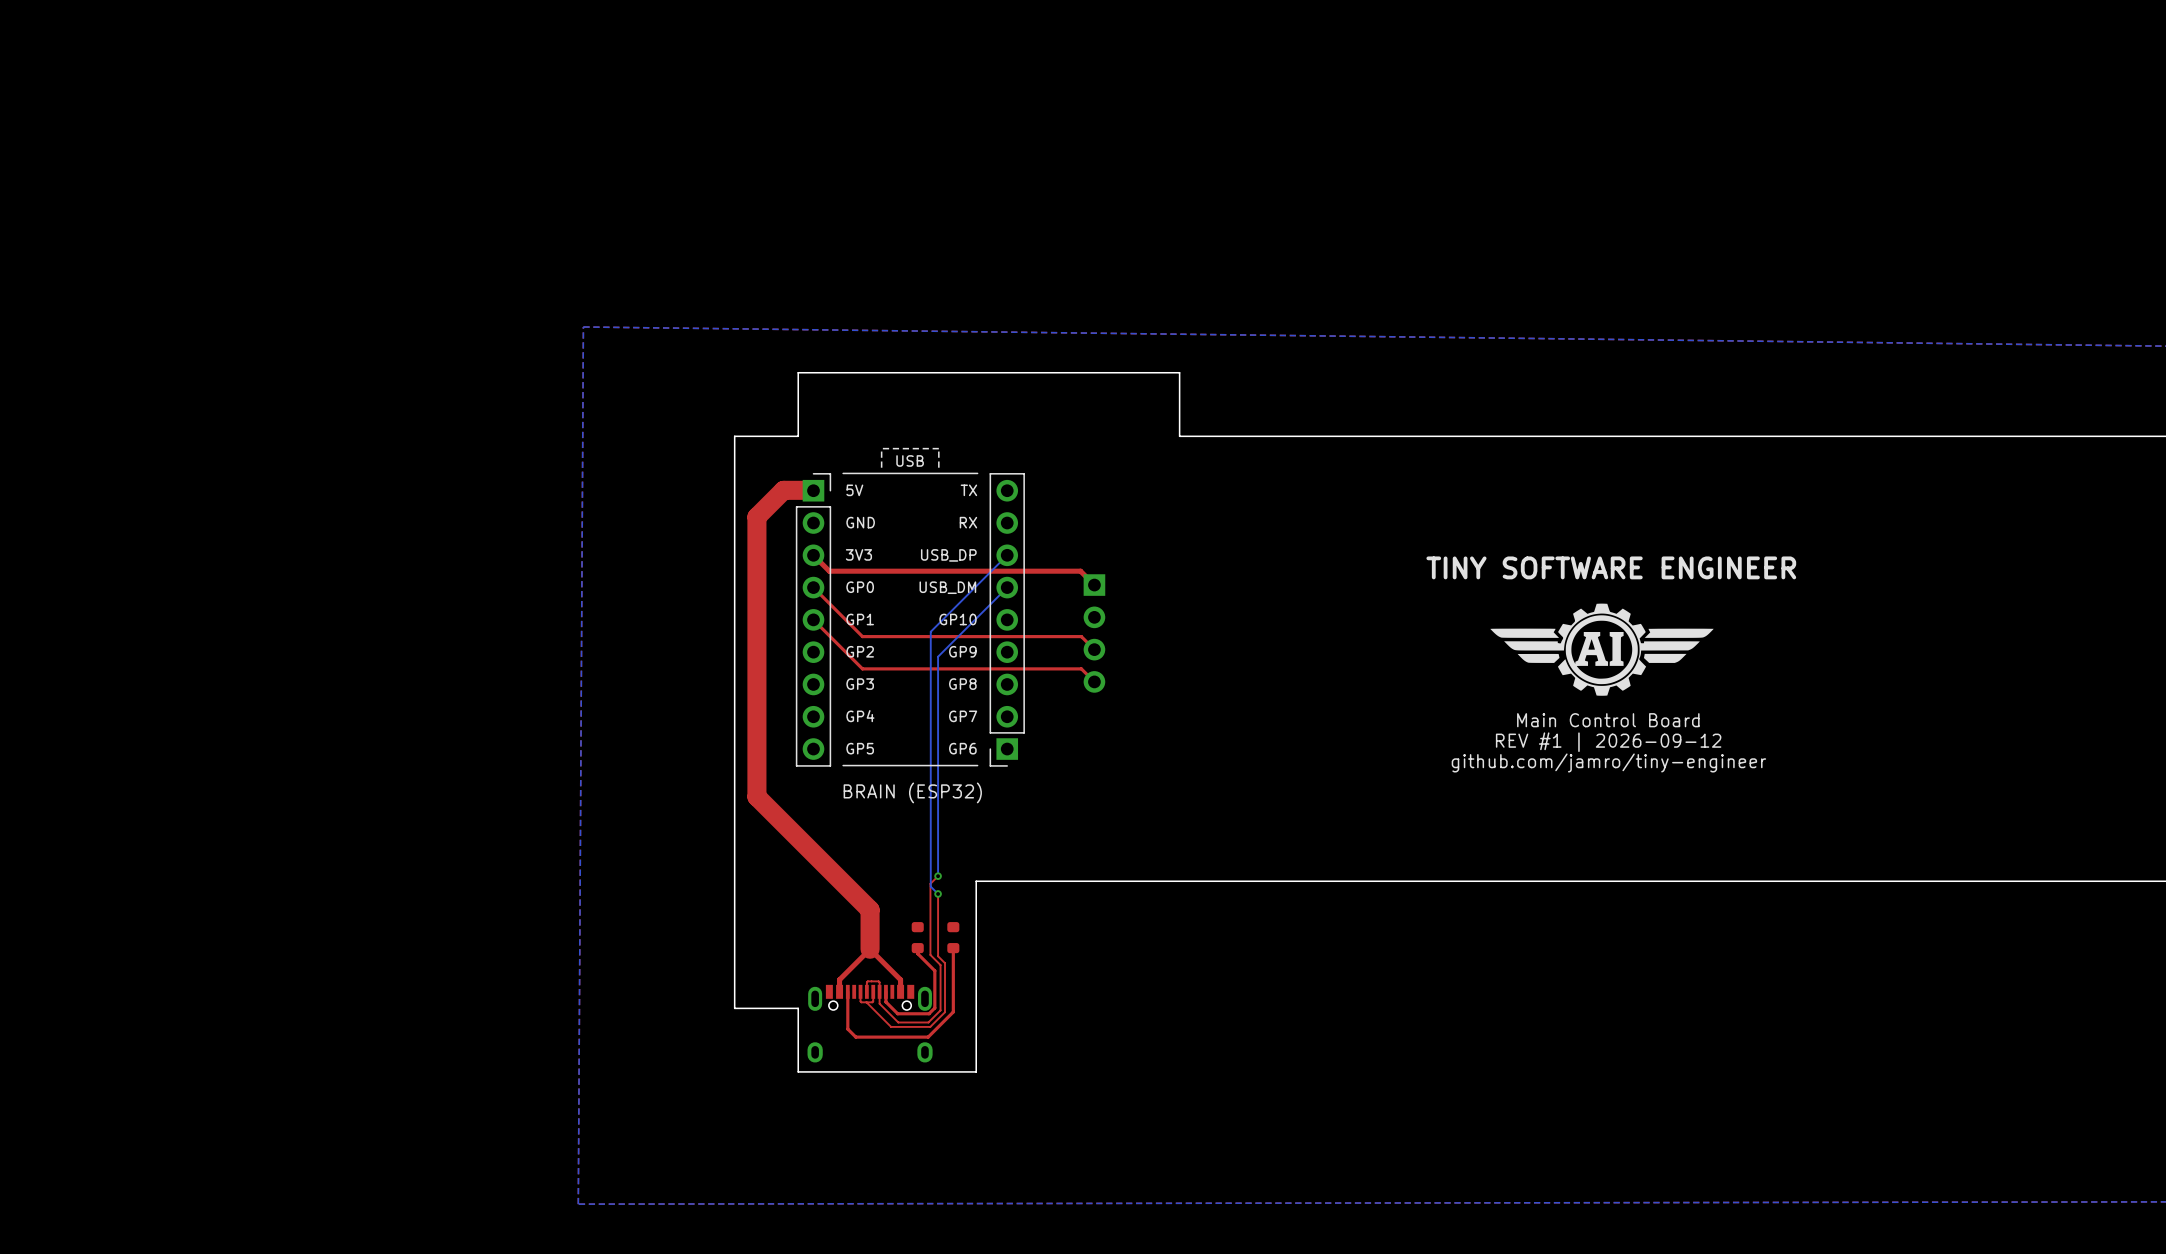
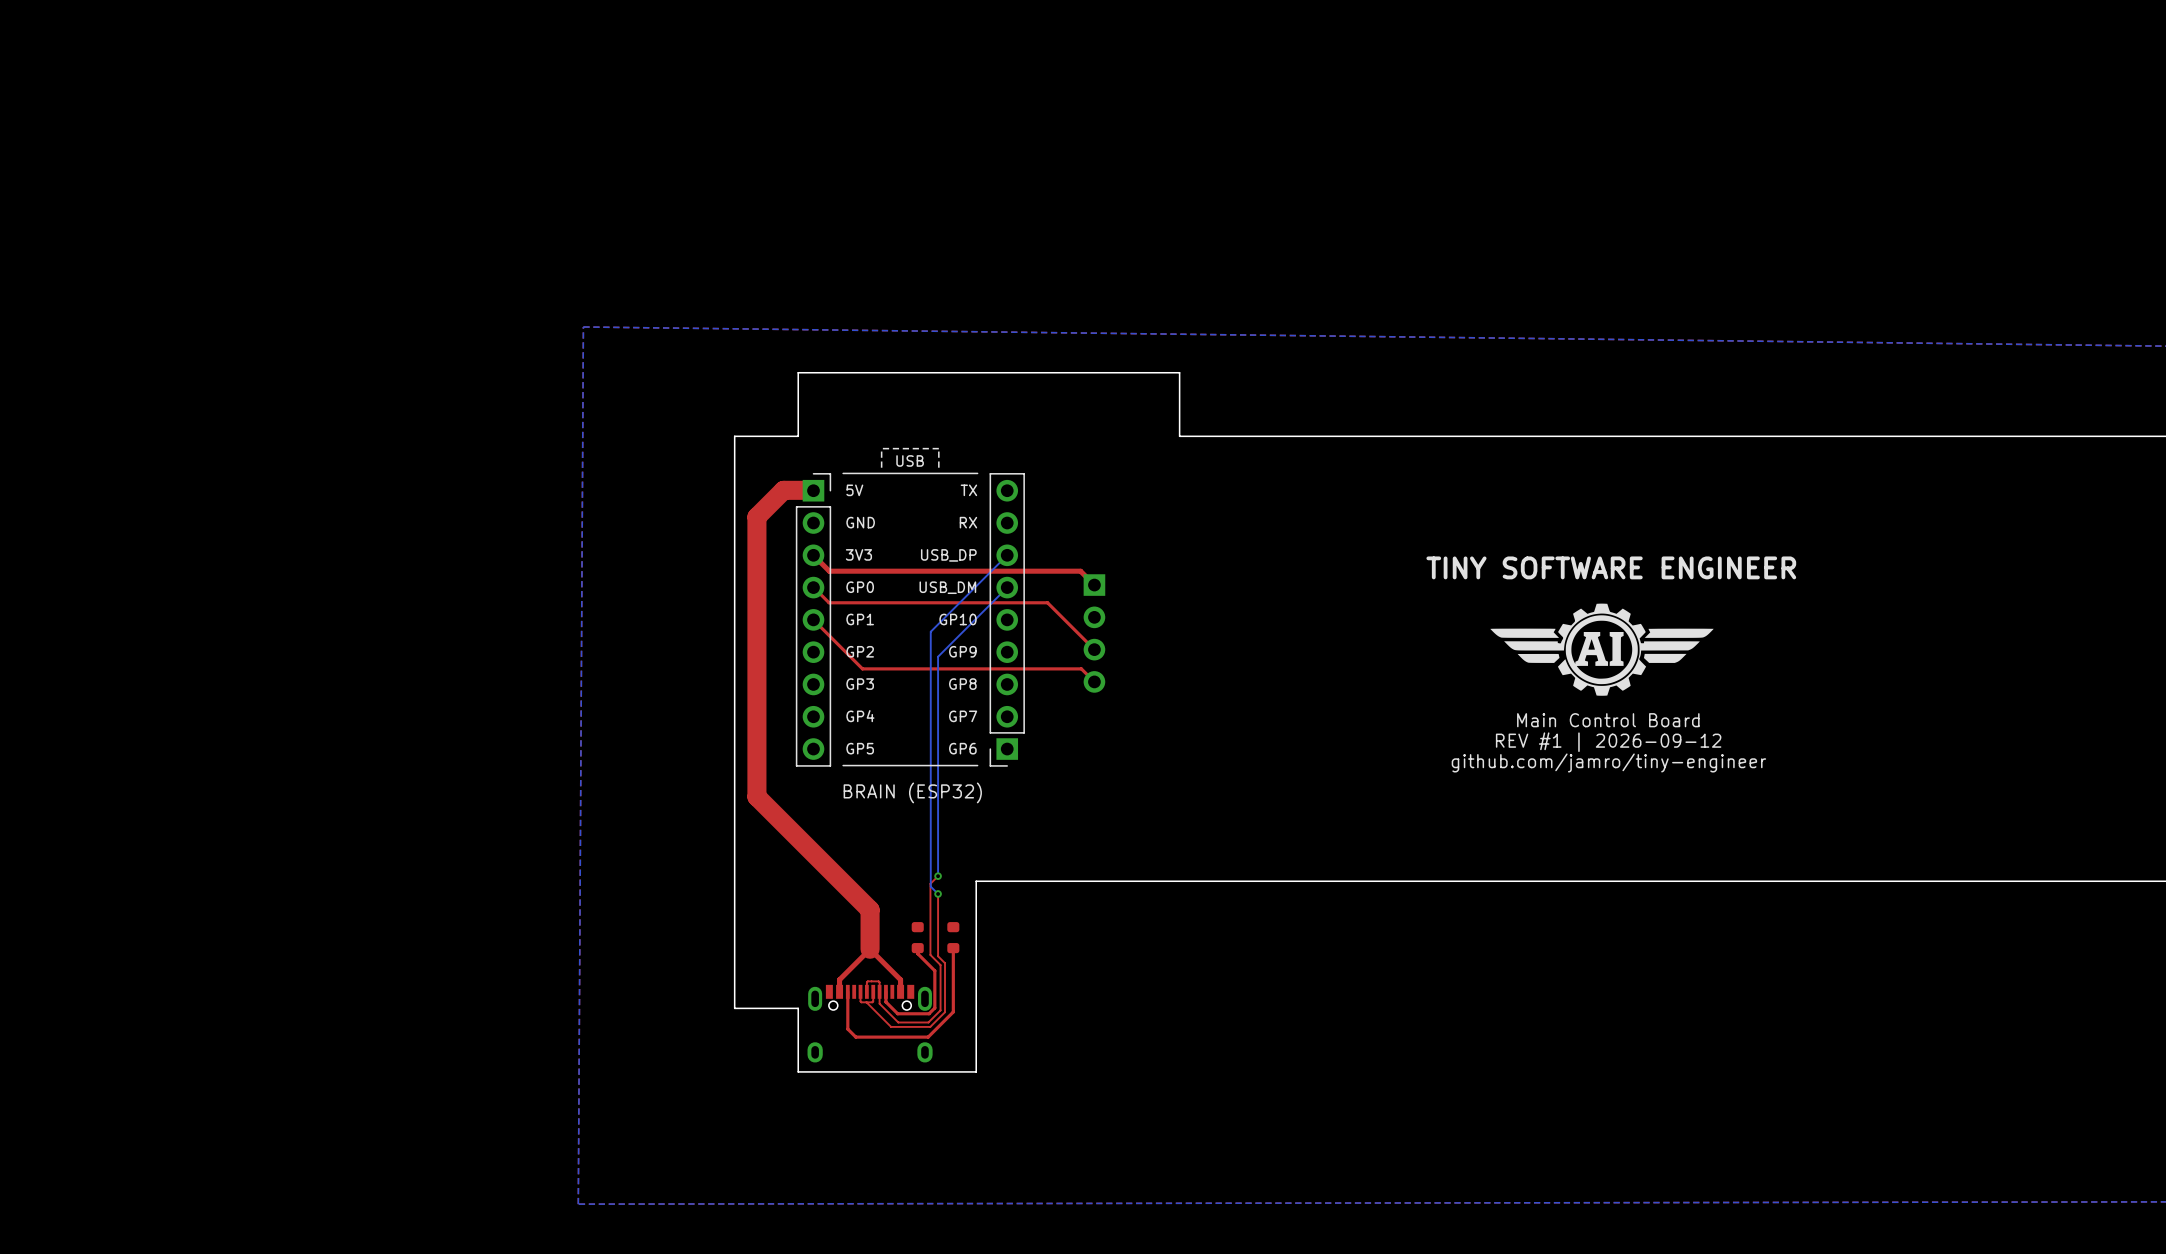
top track: (813, 587) (862, 636) (1081, 636) -> (813, 587) (829, 602) (1047, 602) (1081, 636)

